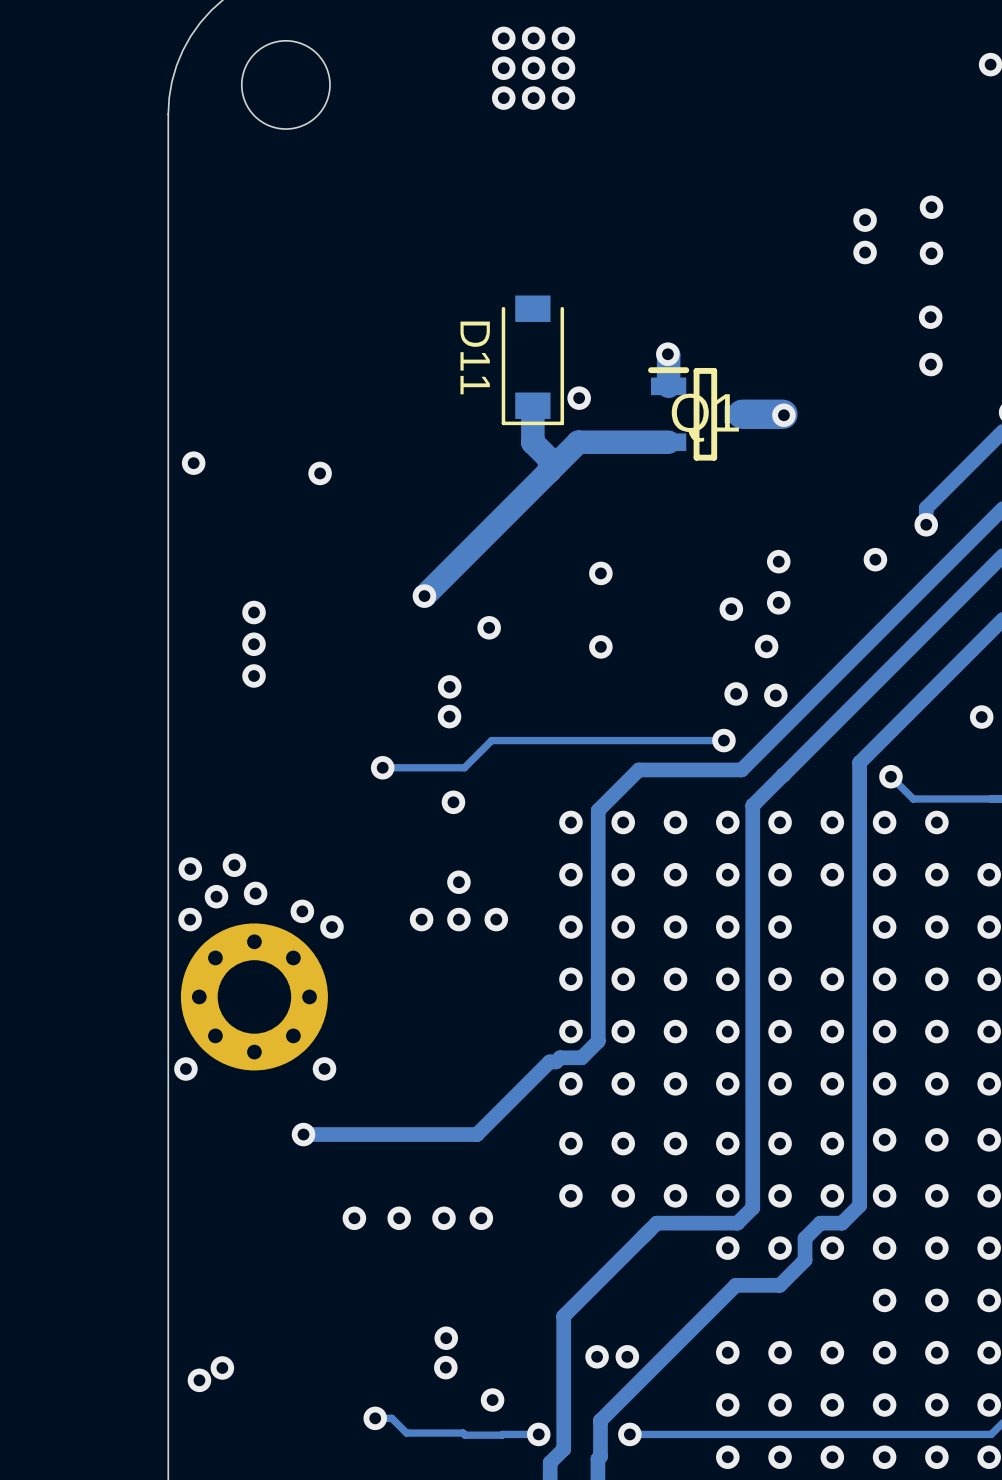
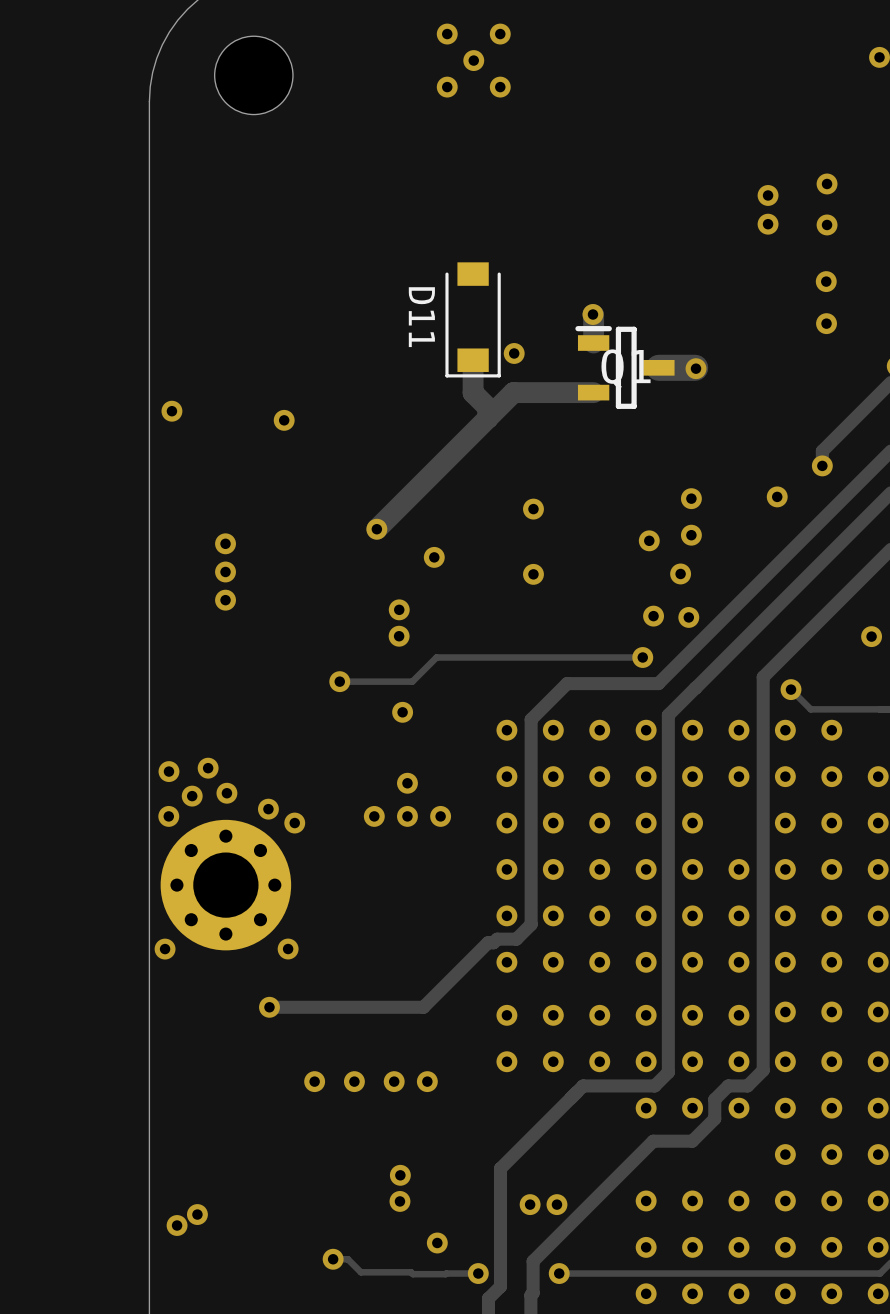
via: (533, 38) -> none
via: (503, 68) -> none
via: (563, 68) -> none
via: (533, 98) -> none
via: none -> (400, 1175)
via: (446, 1338) -> none
via: none -> (399, 1201)
via: (445, 1367) -> none

